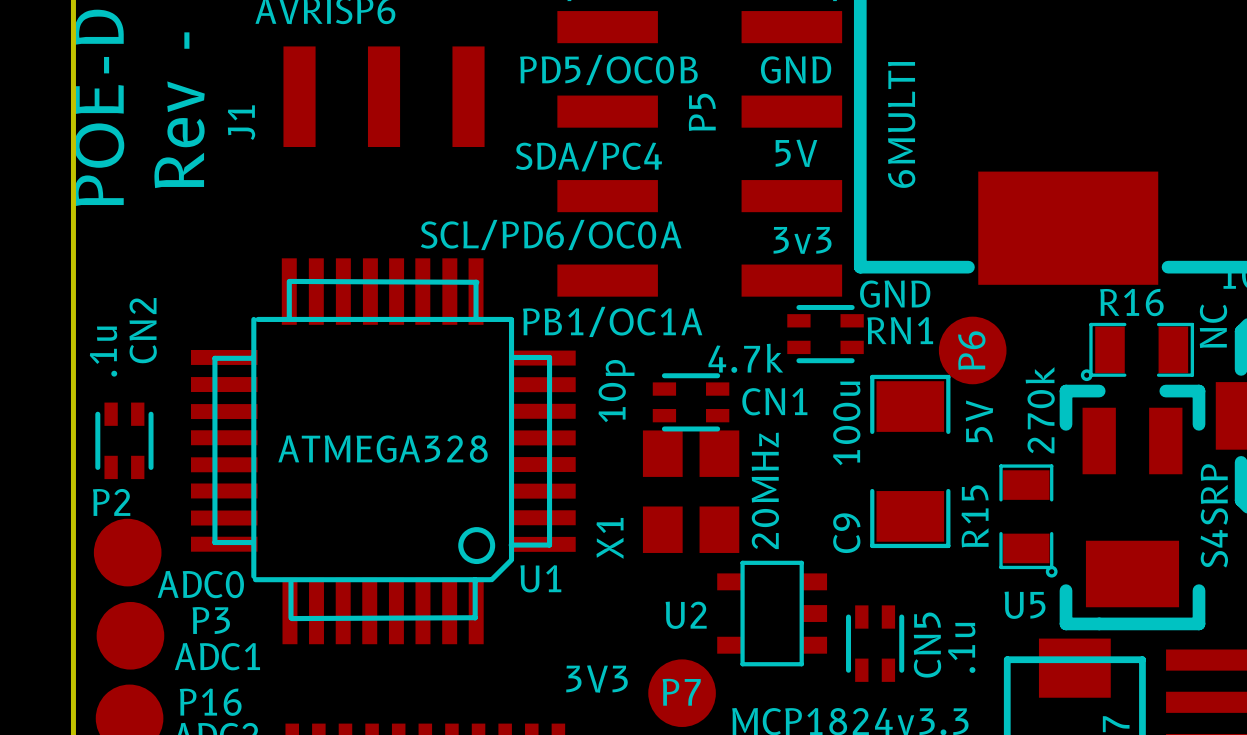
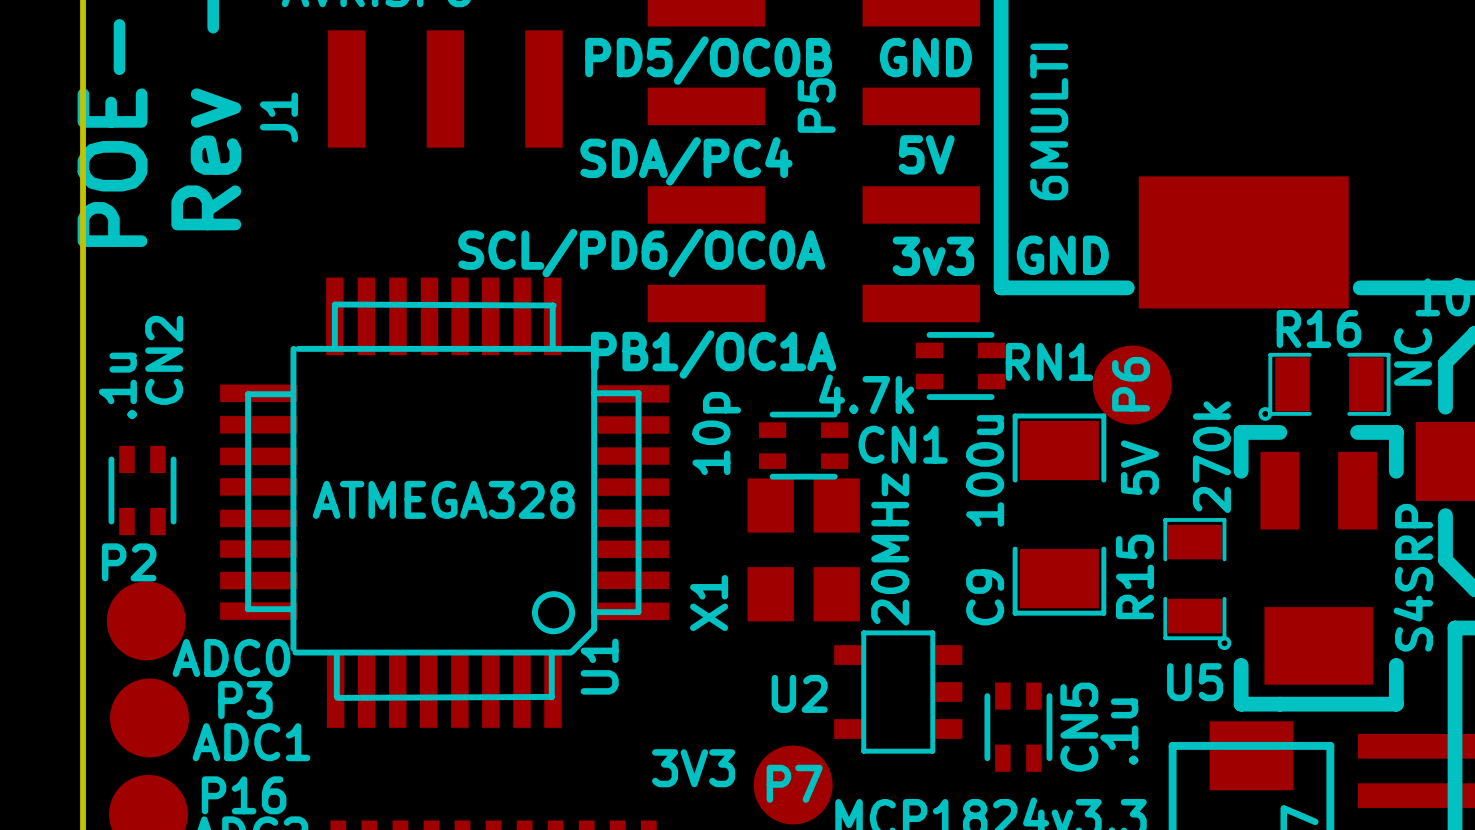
text position: GND (895, 294) -> GND (1062, 255)
U1 name rotation: 0° (540, 578) -> 90° counterclockwise (599, 666)

